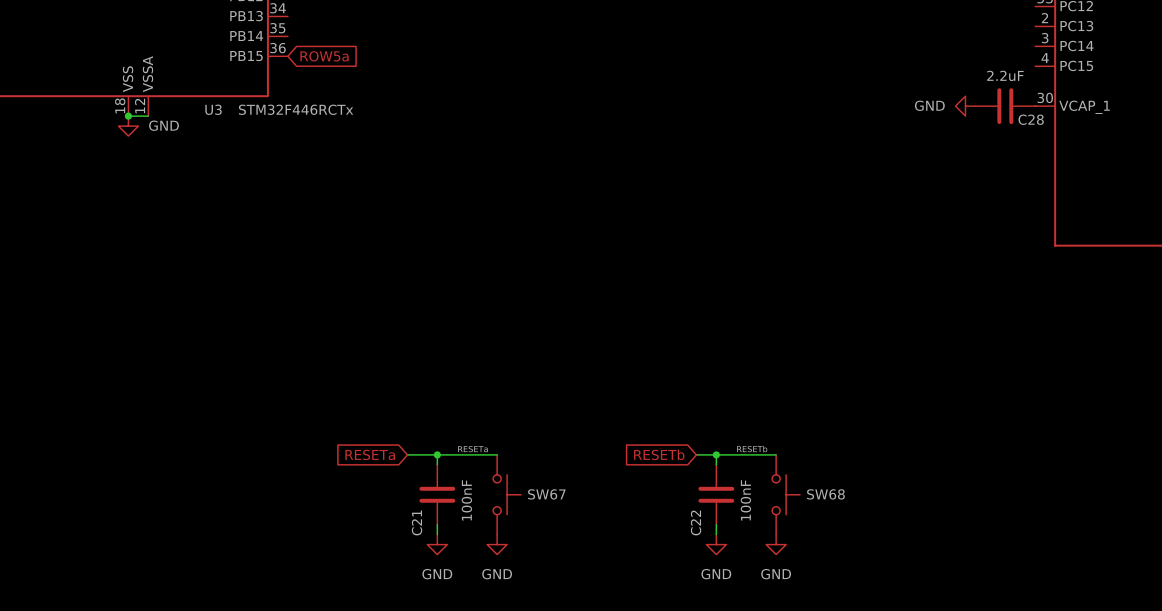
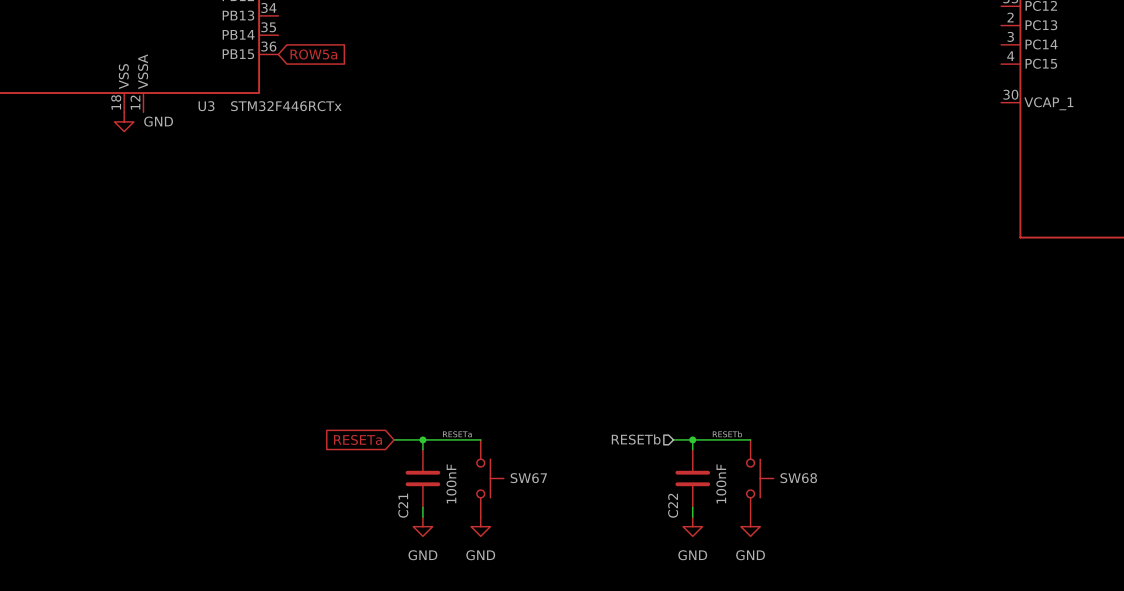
power symbol: GND (965, 106) -> none
C28: 2.2uF (1005, 106) -> none
wire: (128, 116) (148, 116) -> none
junction: (128, 116) -> none
hierarchical label: none -> RESETb (636, 439)
global label: RESETb (659, 454) -> none

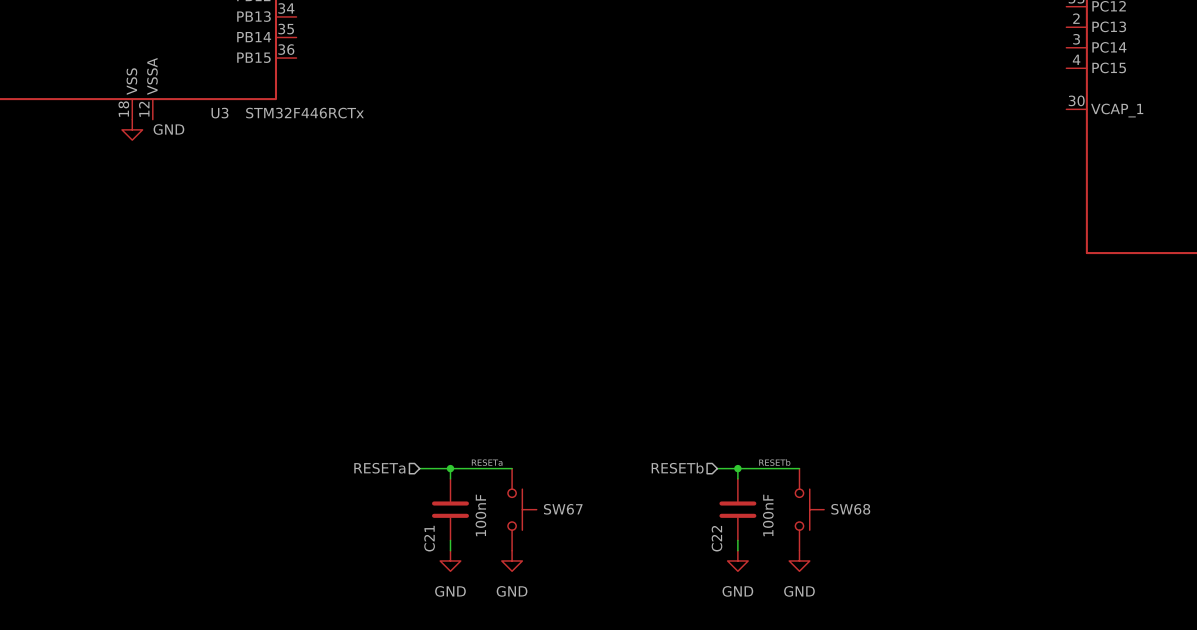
global label: ROW5a (313, 54) -> none
hierarchical label: none -> RESETa (379, 468)
global label: RESETa (358, 439) -> none

